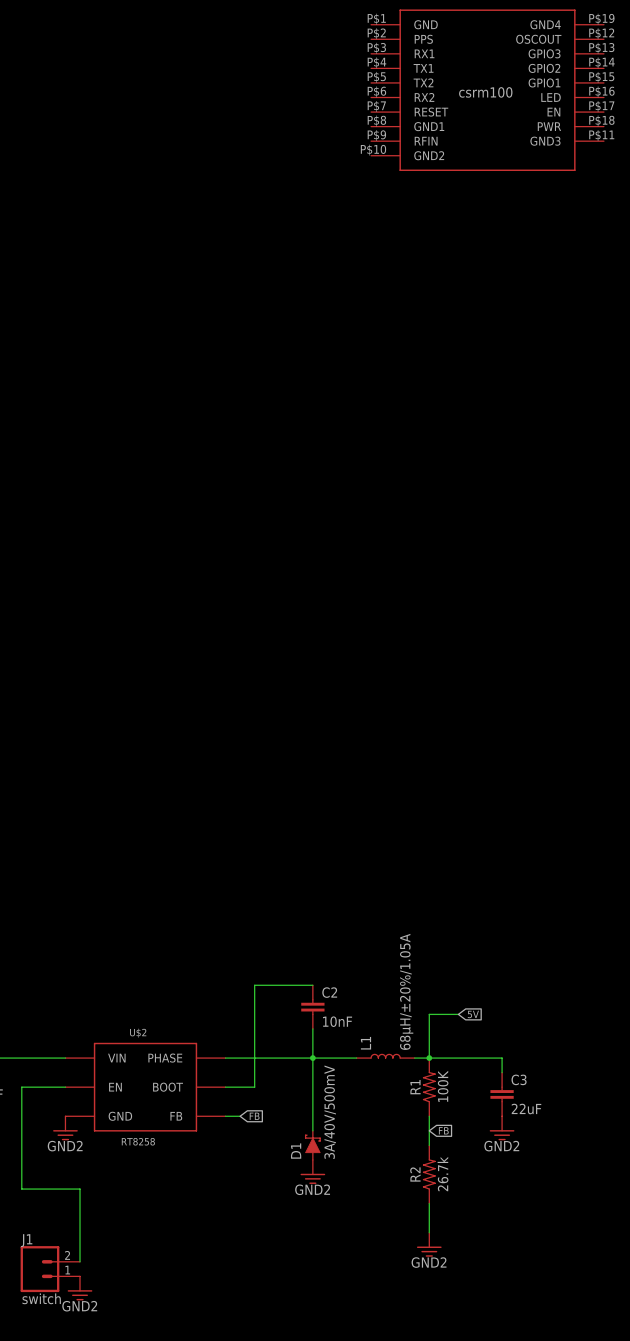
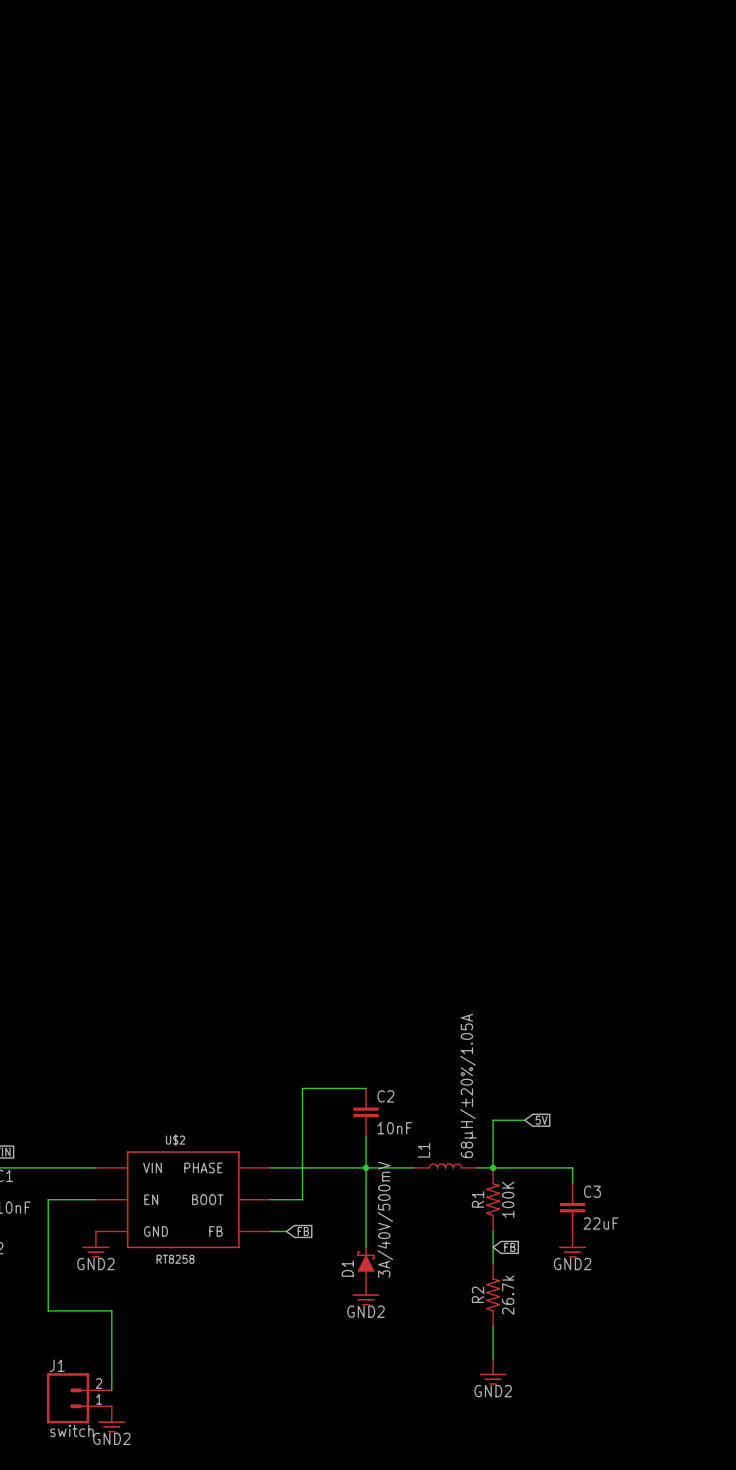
part: (487, 90) -> none

